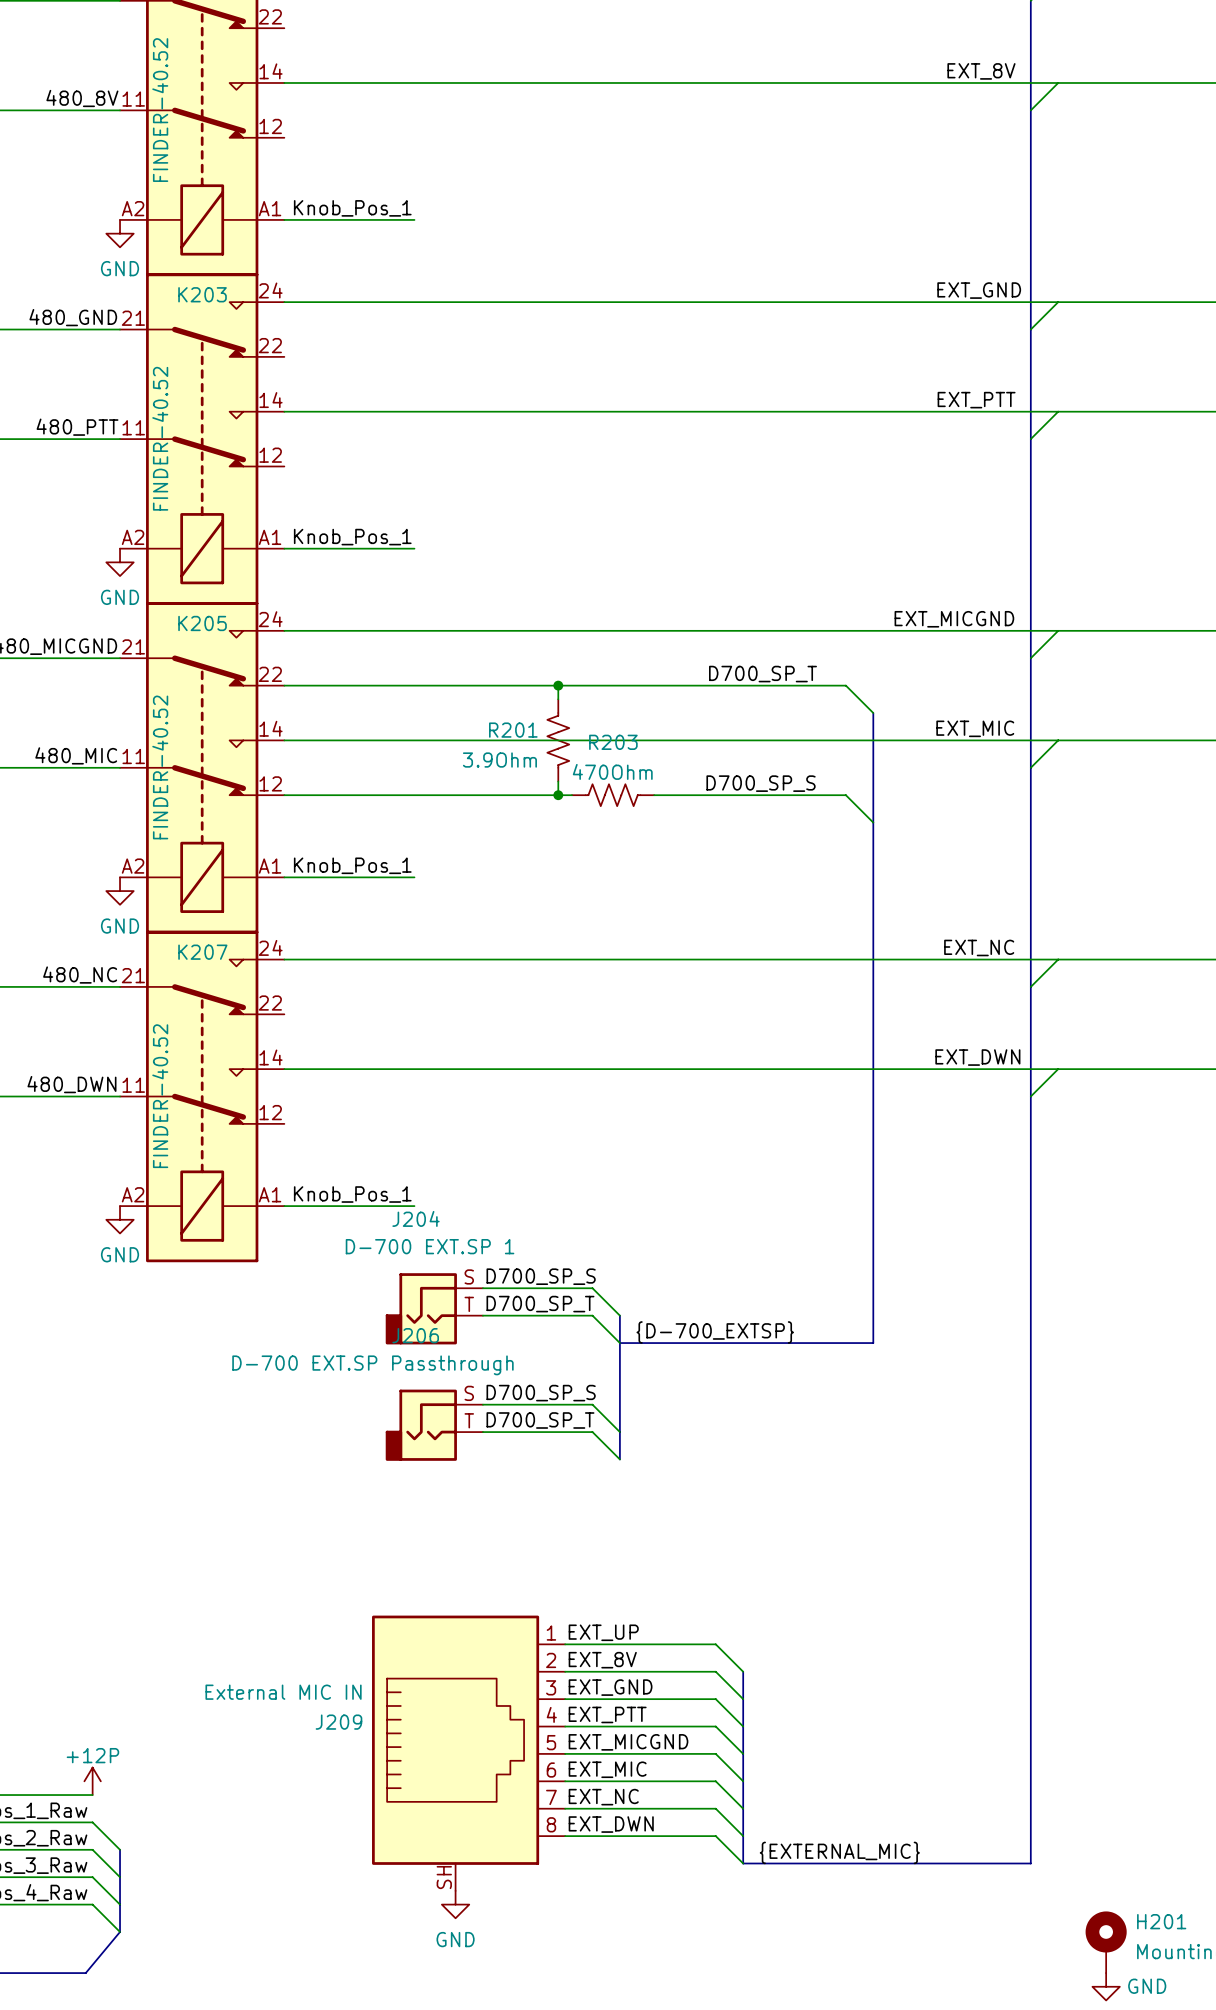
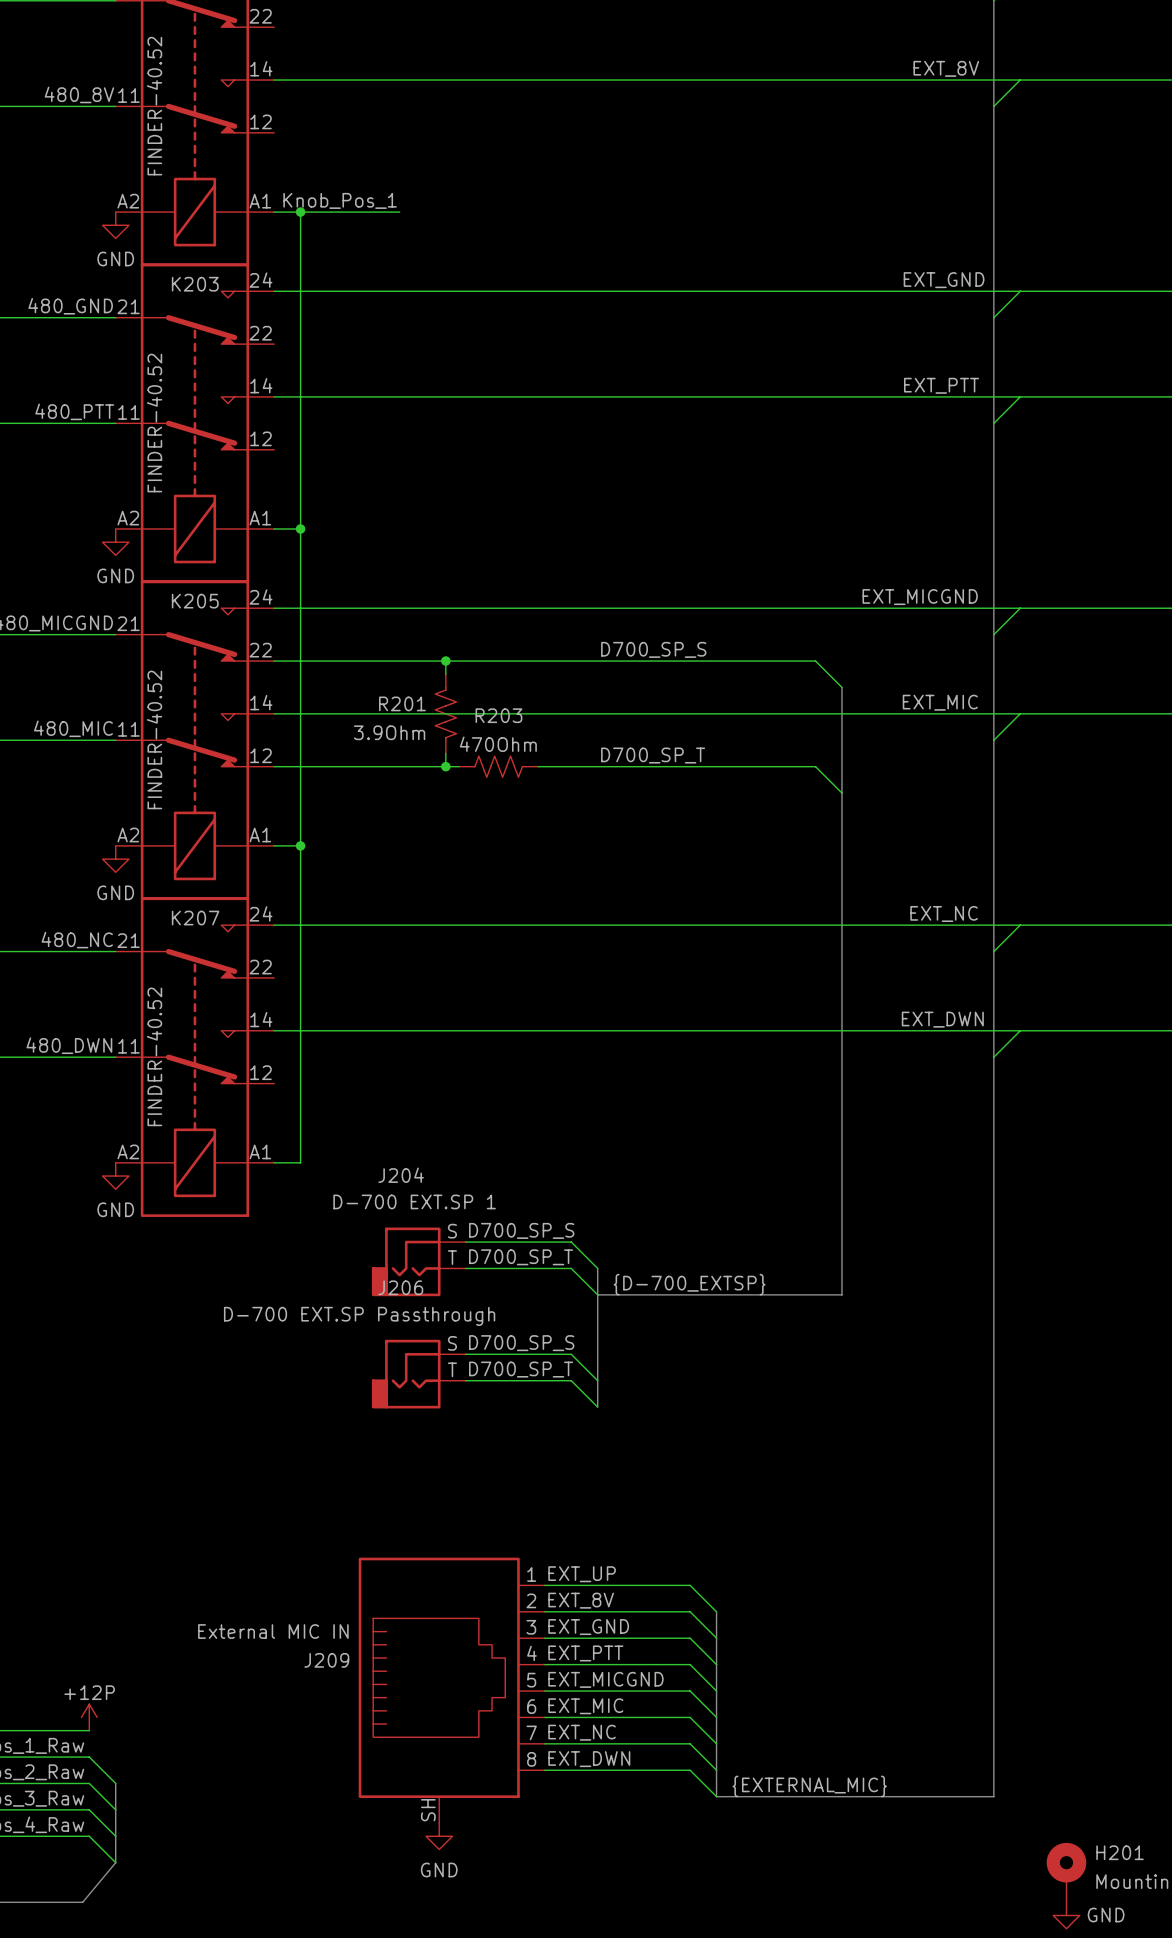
junction: none -> (300, 212)
label: Knob_Pos_1 (352, 537) -> none
wire: (311, 548) (414, 548) -> none
junction: none -> (300, 528)
label position: D700_SP_T (762, 674) -> D700_SP_T (653, 755)
junction: none -> (445, 661)
wire: (558, 685) (558, 699) -> (445, 661) (445, 674)
junction: (558, 685) -> none
R201 position: (558, 740) -> (445, 713)
wire: none -> (445, 753) (445, 766)
wire: (558, 781) (558, 795) (476, 795) -> none
label position: D700_SP_S (761, 783) -> D700_SP_S (653, 649)
junction: none -> (445, 766)
junction: (558, 795) -> none
R203 position: (613, 795) -> (498, 766)
label: Knob_Pos_1 (352, 865) -> none
wire: (311, 877) (414, 877) -> none
junction: none -> (300, 845)
label: Knob_Pos_1 (352, 1194) -> none
wire: (311, 1206) (414, 1206) -> (300, 1162) (300, 212)

